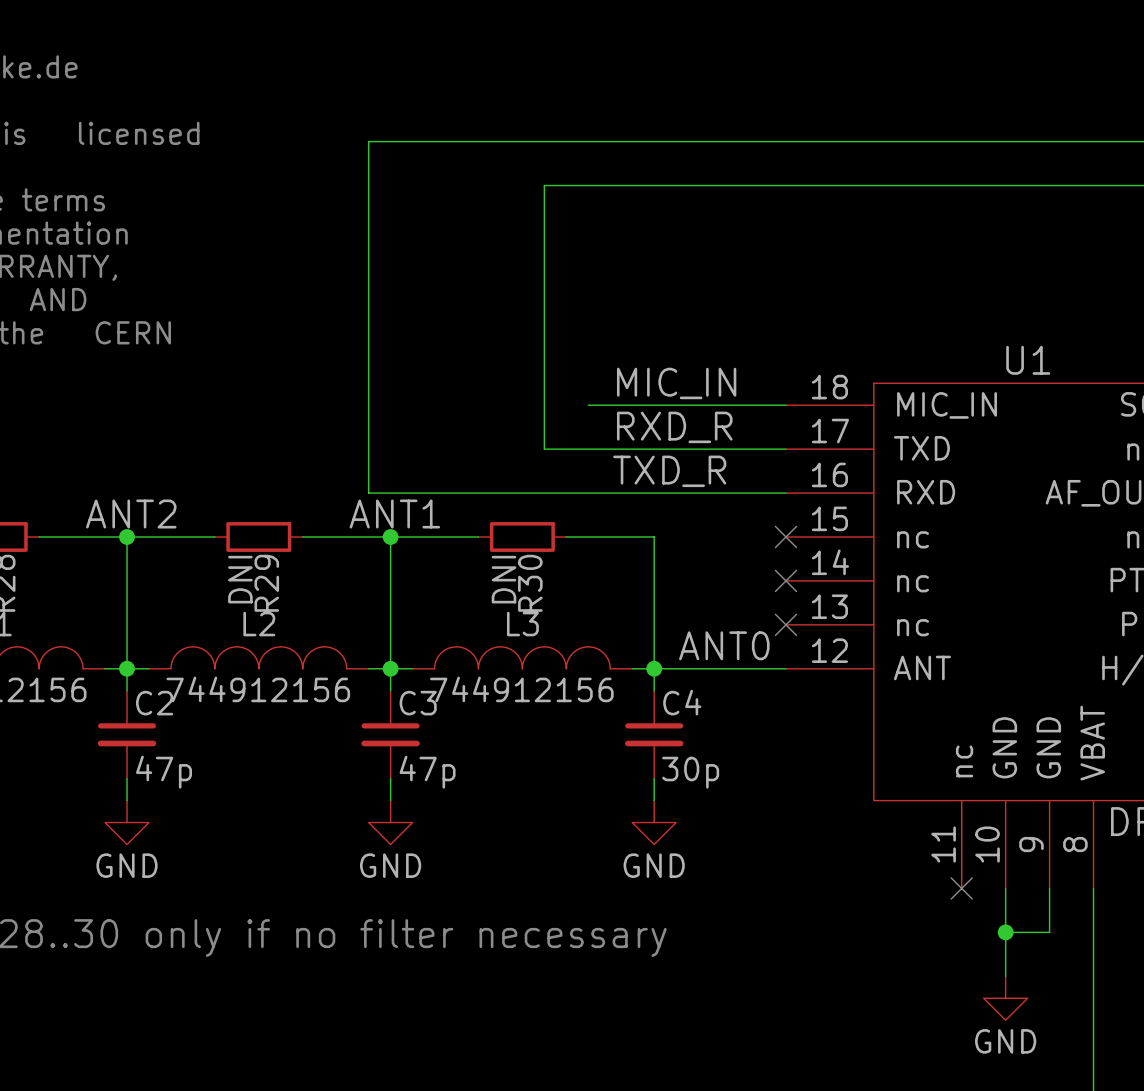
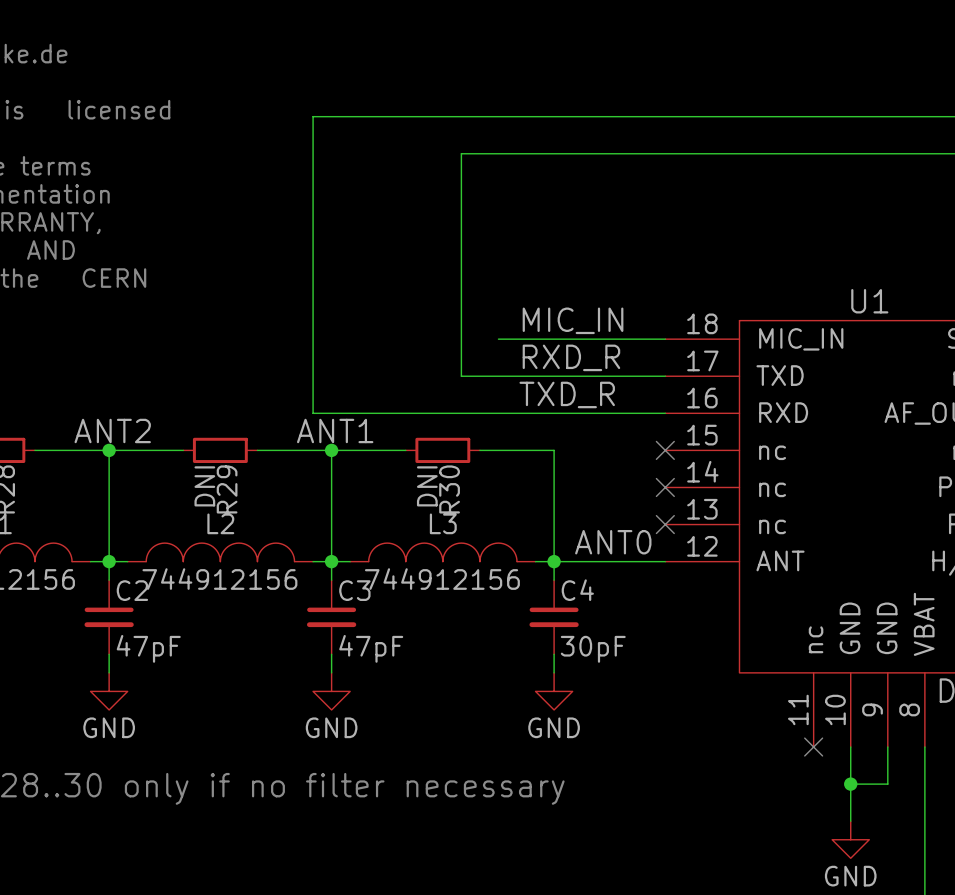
C2 value: 47p (163, 772) -> 47pF (148, 648)
C3 value: 47p (427, 772) -> 47pF (371, 648)
C4 value: 30p (690, 772) -> 30pF (593, 649)

